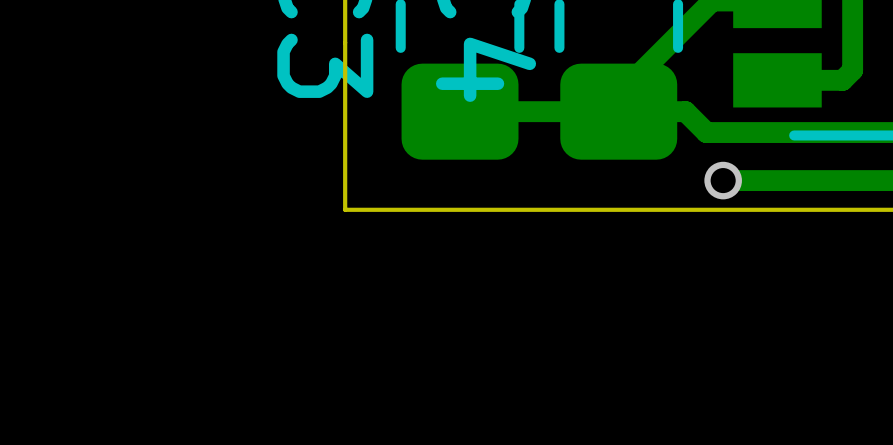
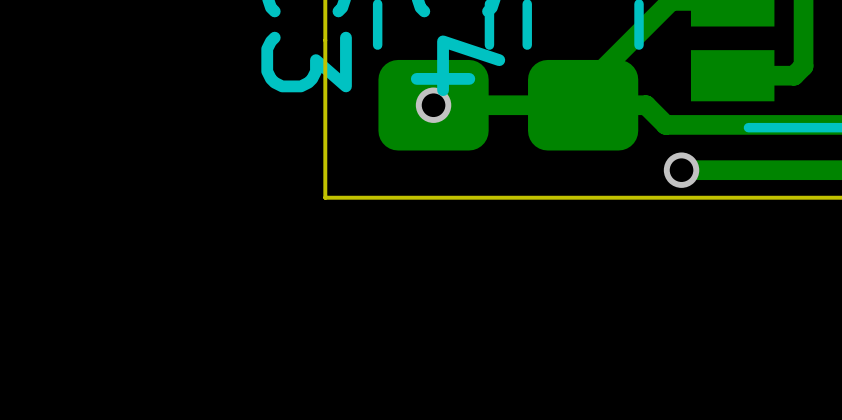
via: none -> (433, 105)

